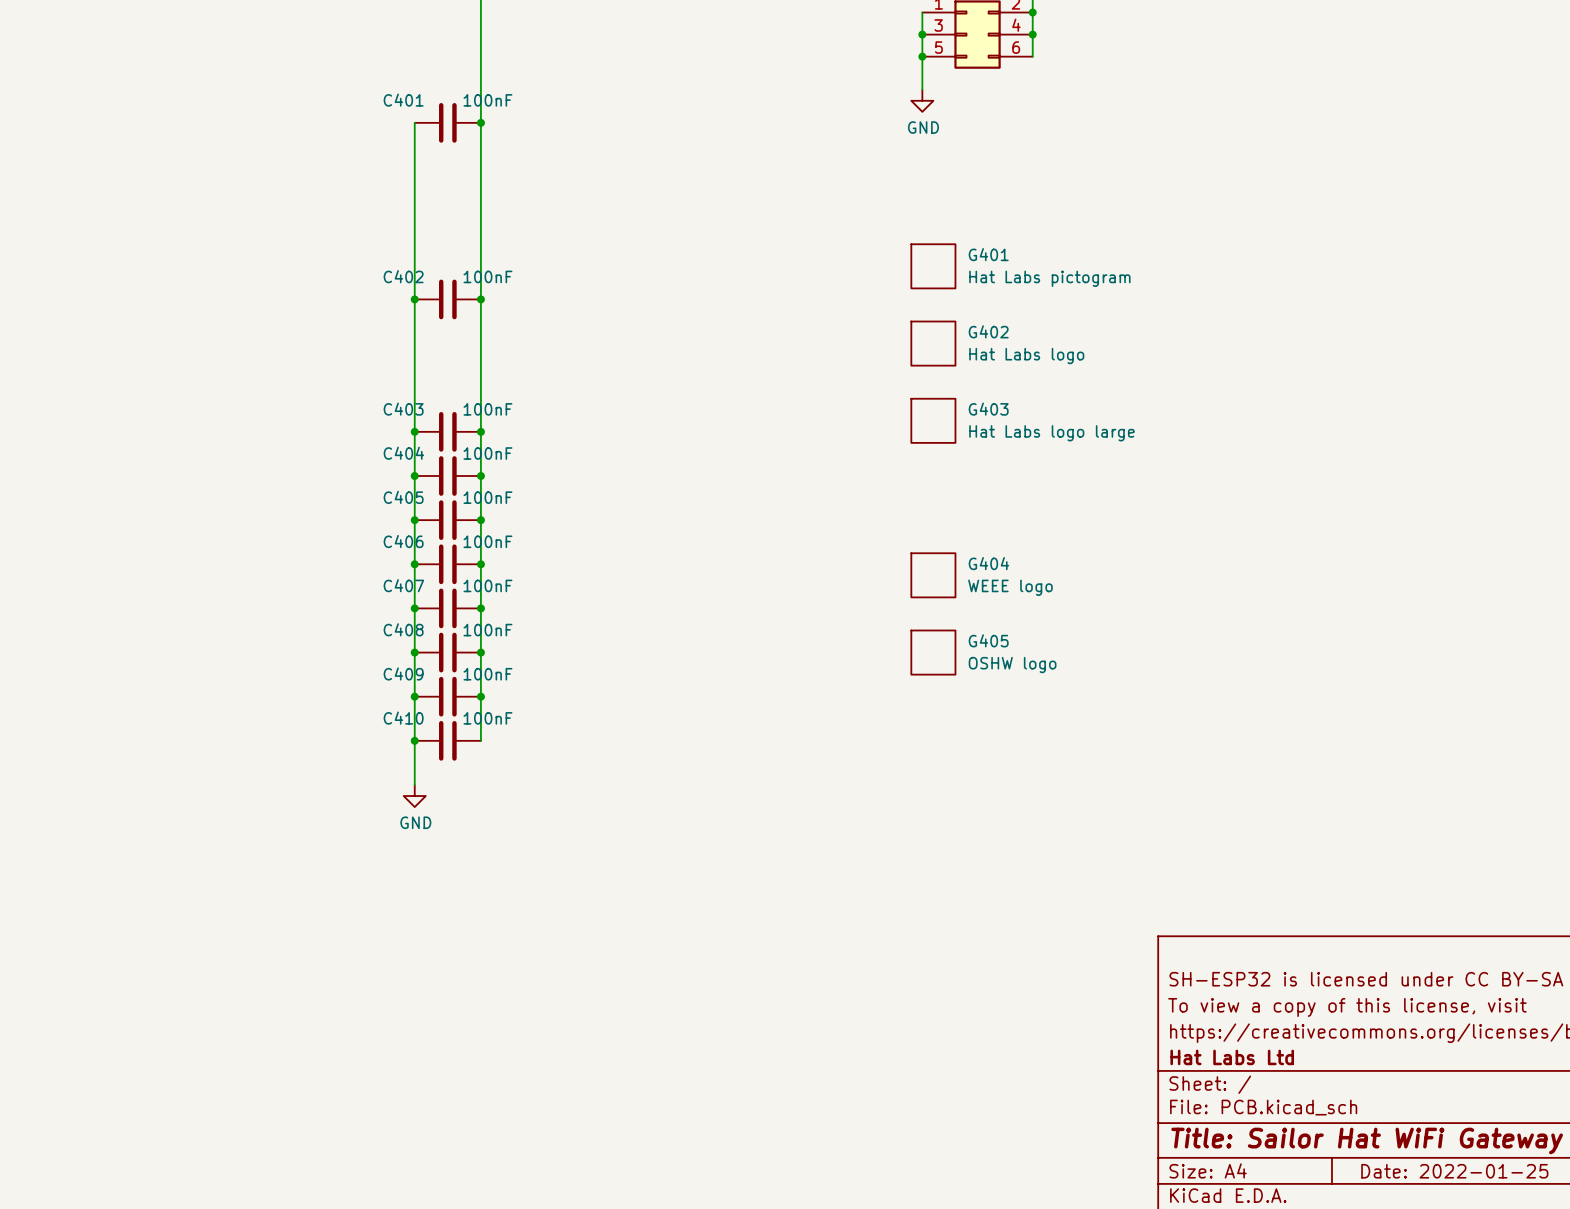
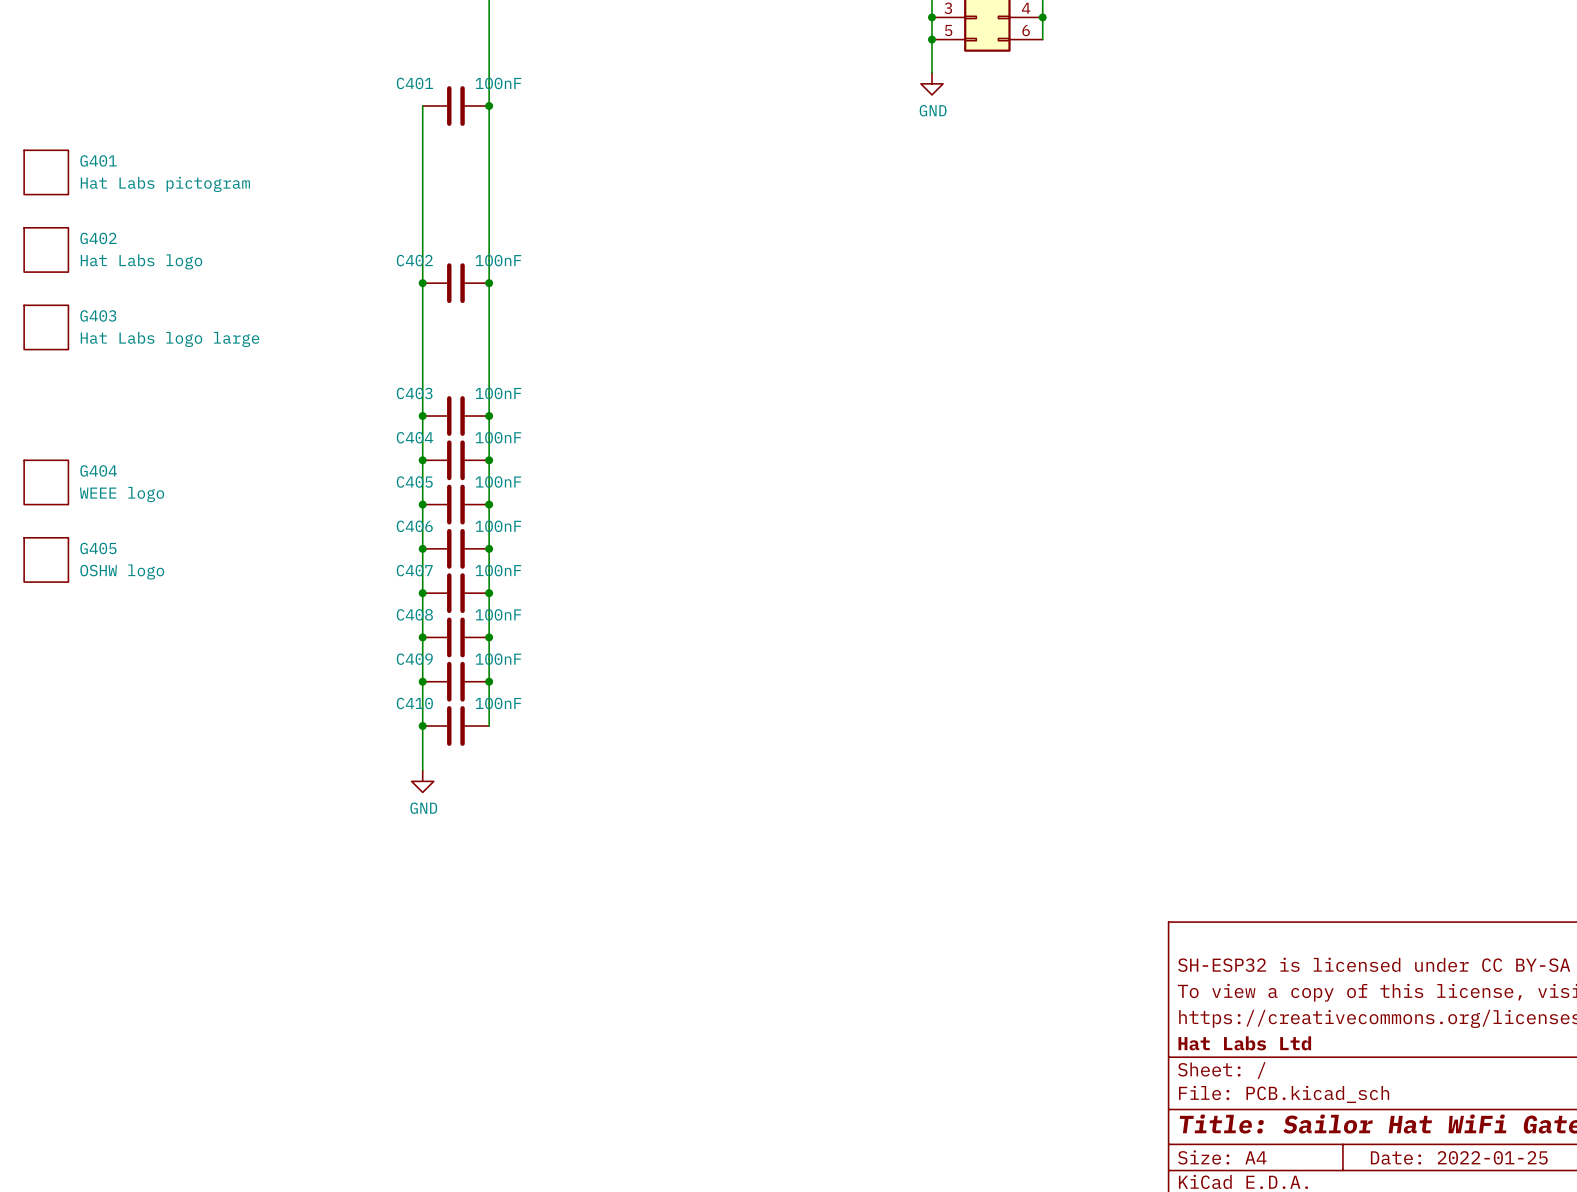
G401 position: (933, 266) -> (46, 172)
G402 position: (933, 343) -> (46, 249)
G403 position: (933, 420) -> (46, 327)
G404 position: (933, 575) -> (46, 482)
G405 position: (933, 652) -> (46, 559)

